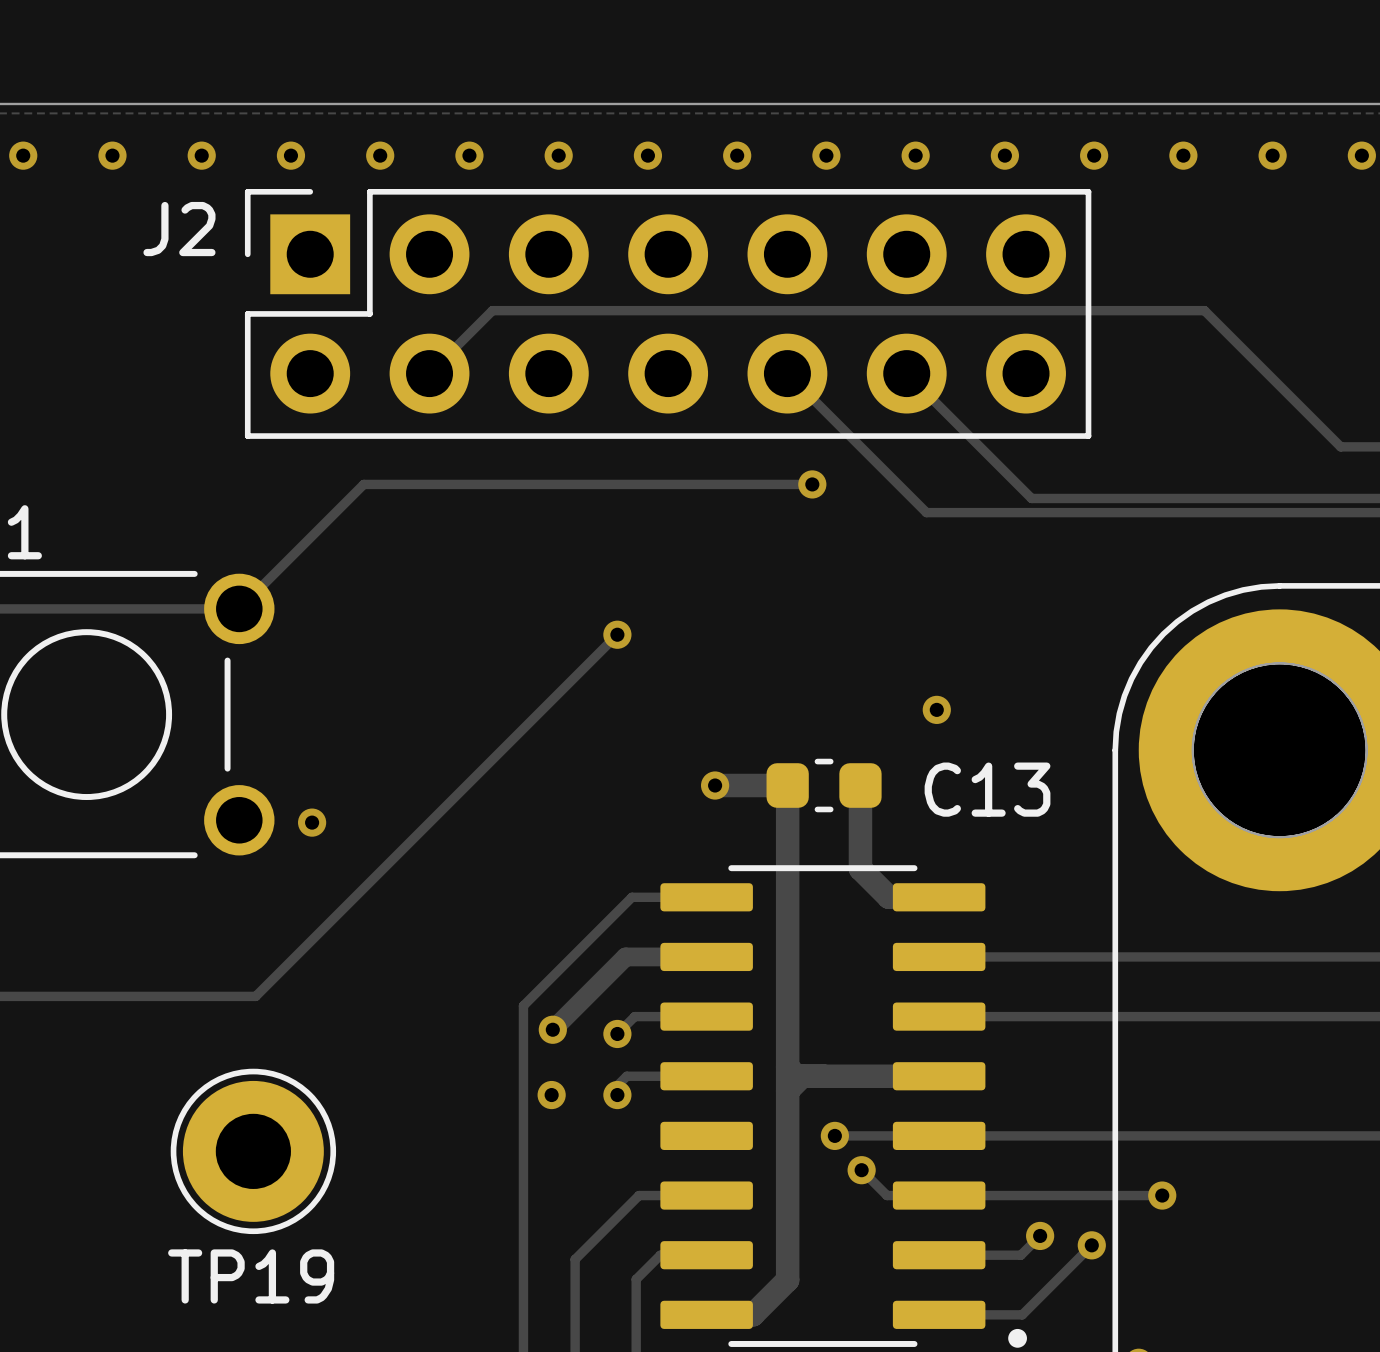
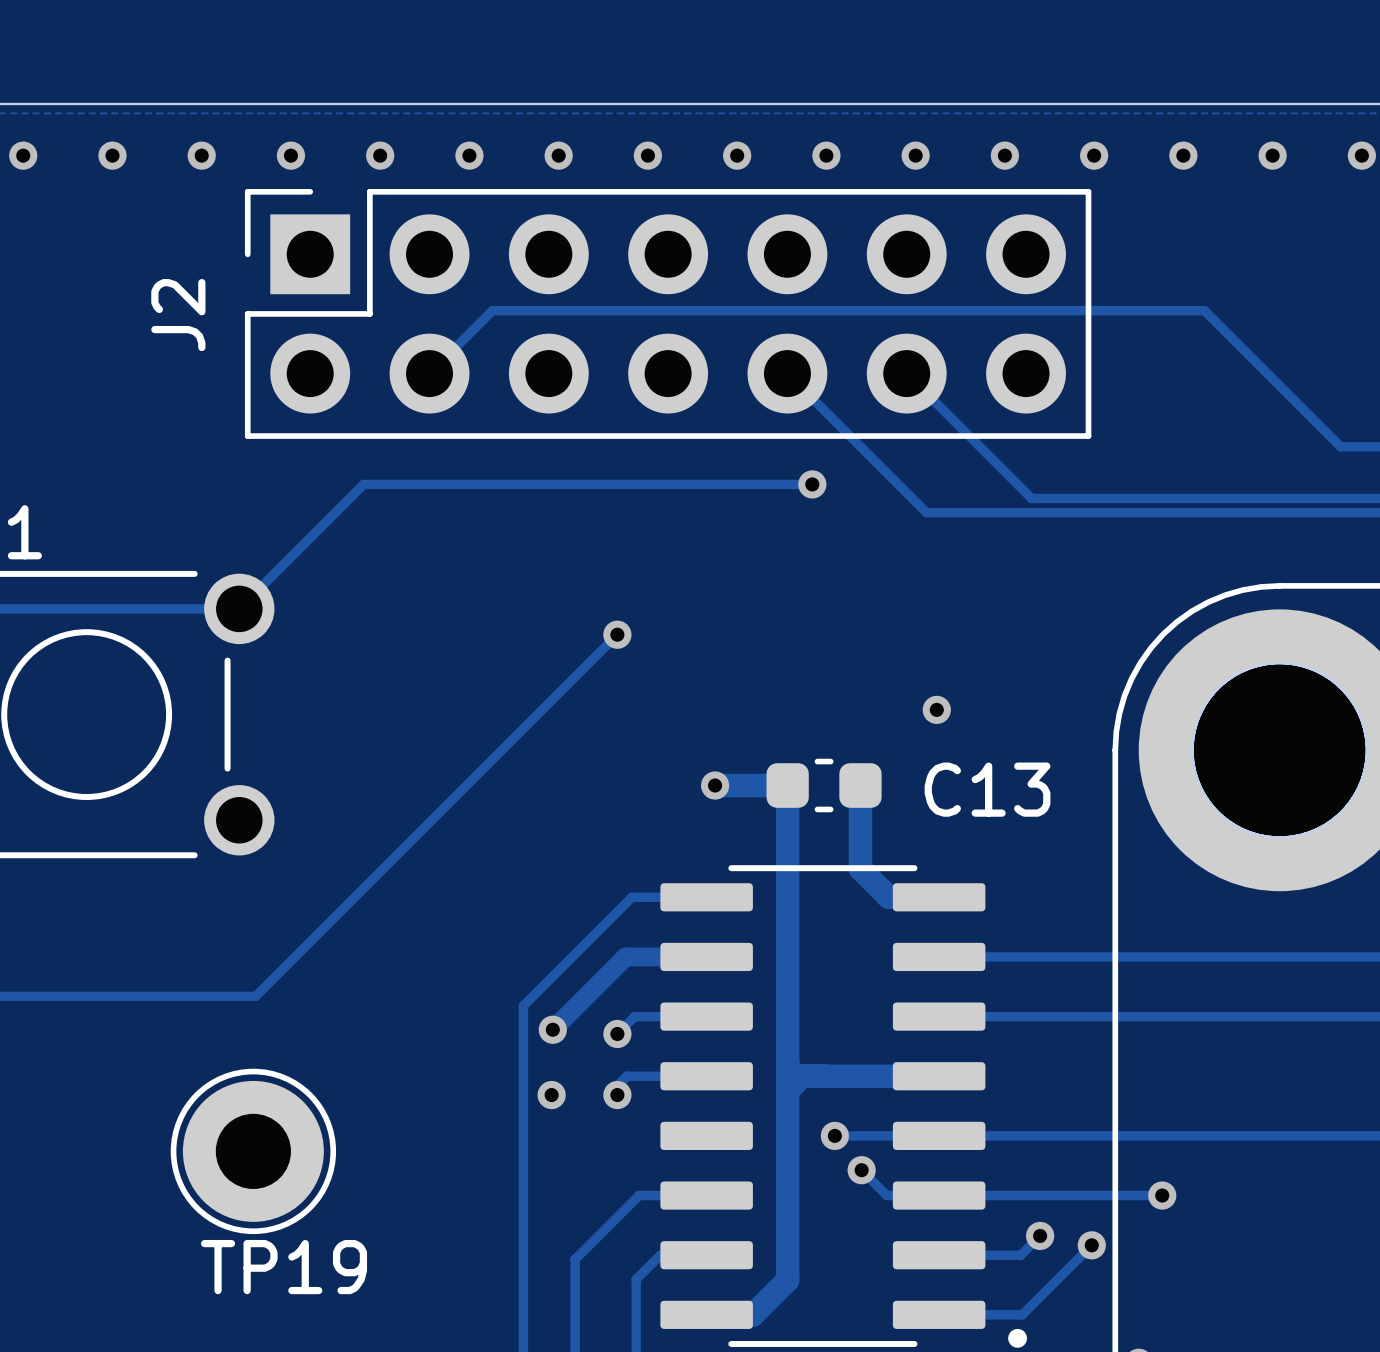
J2 name rotation: 0° (179, 229) -> 90° counterclockwise (178, 315)
via: (312, 822) -> none
TP19 name position: TP19 (251, 1276) -> TP19 (284, 1267)

